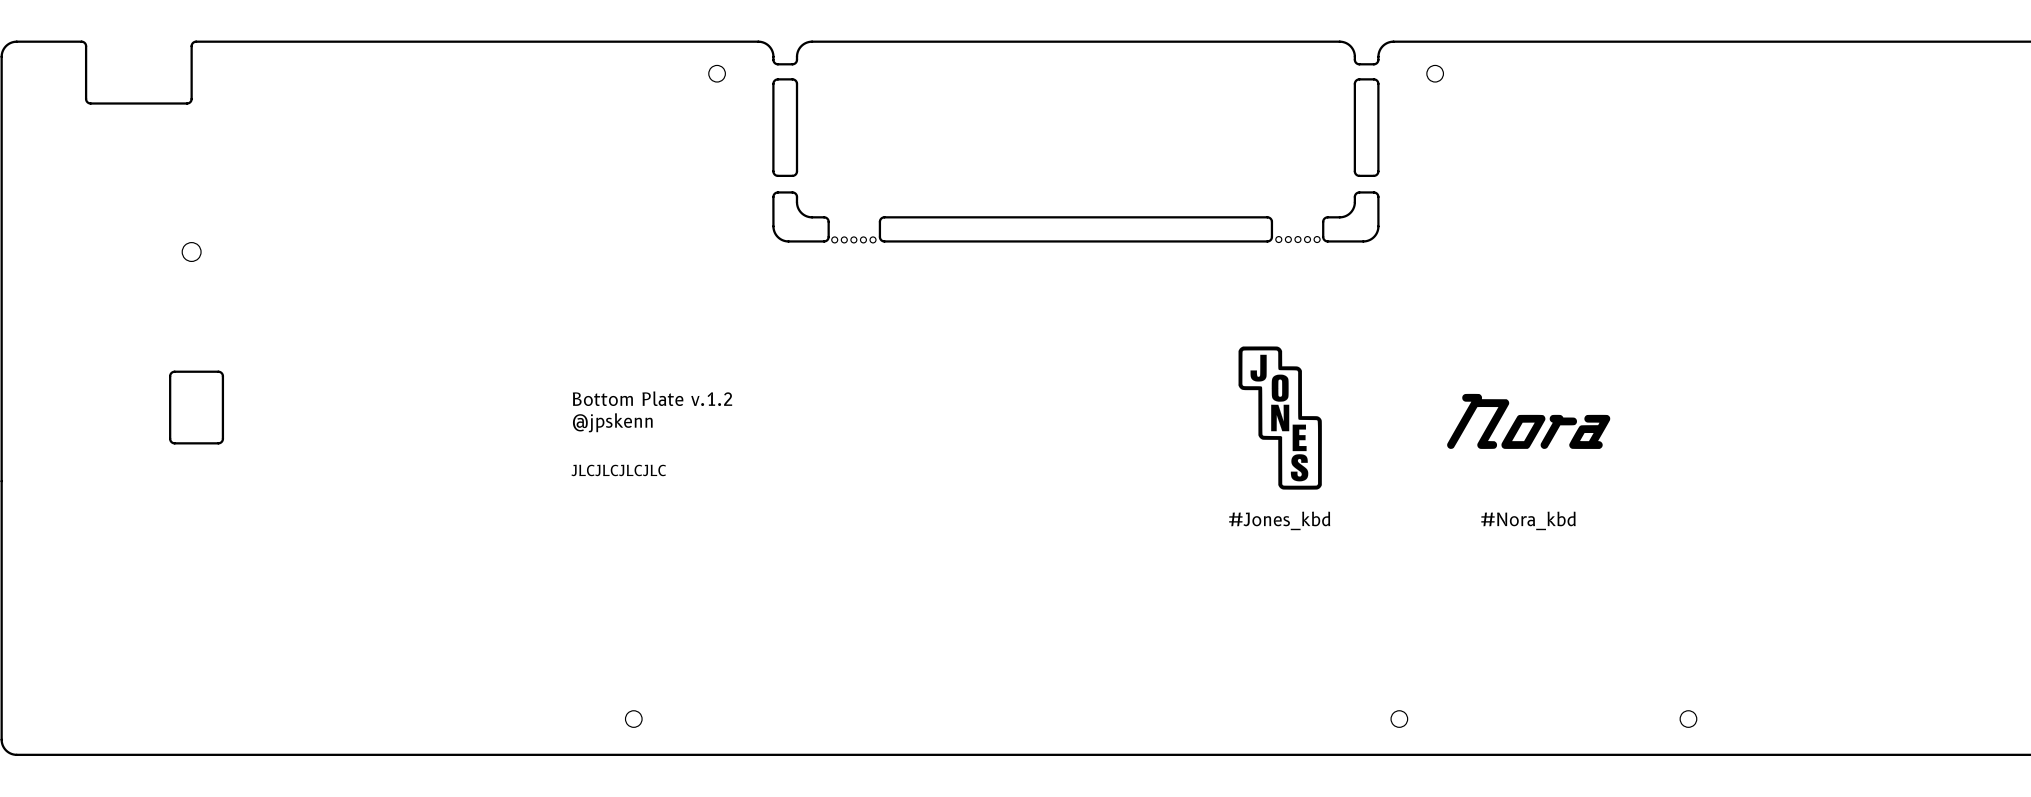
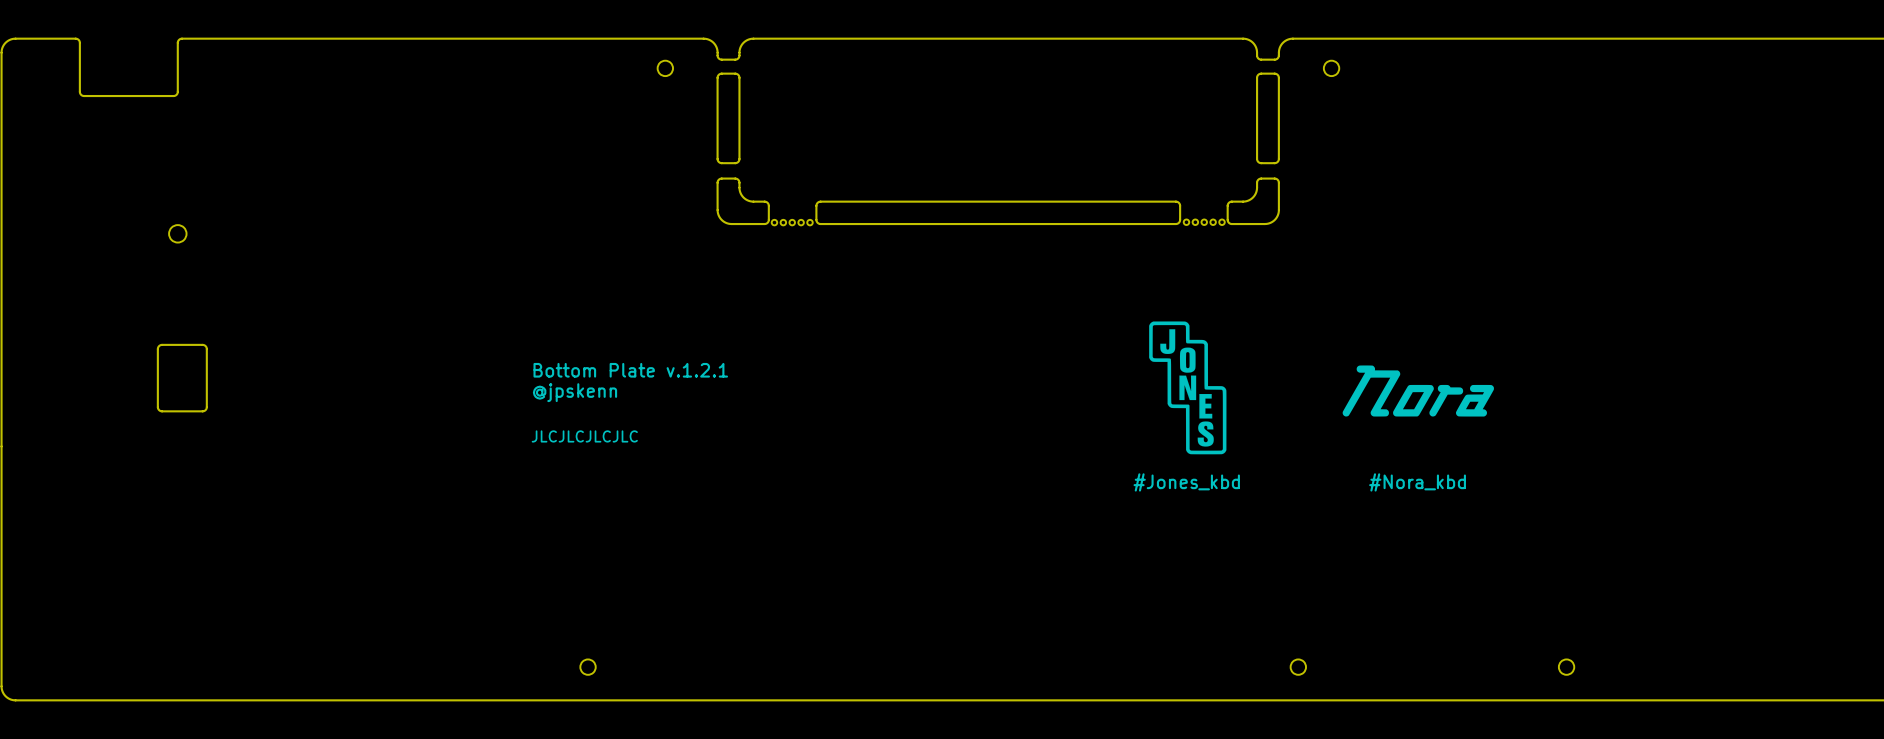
text: Bottom Plate v.1.2 (652, 398) -> Bottom Plate v.1.2.1 (630, 370)

